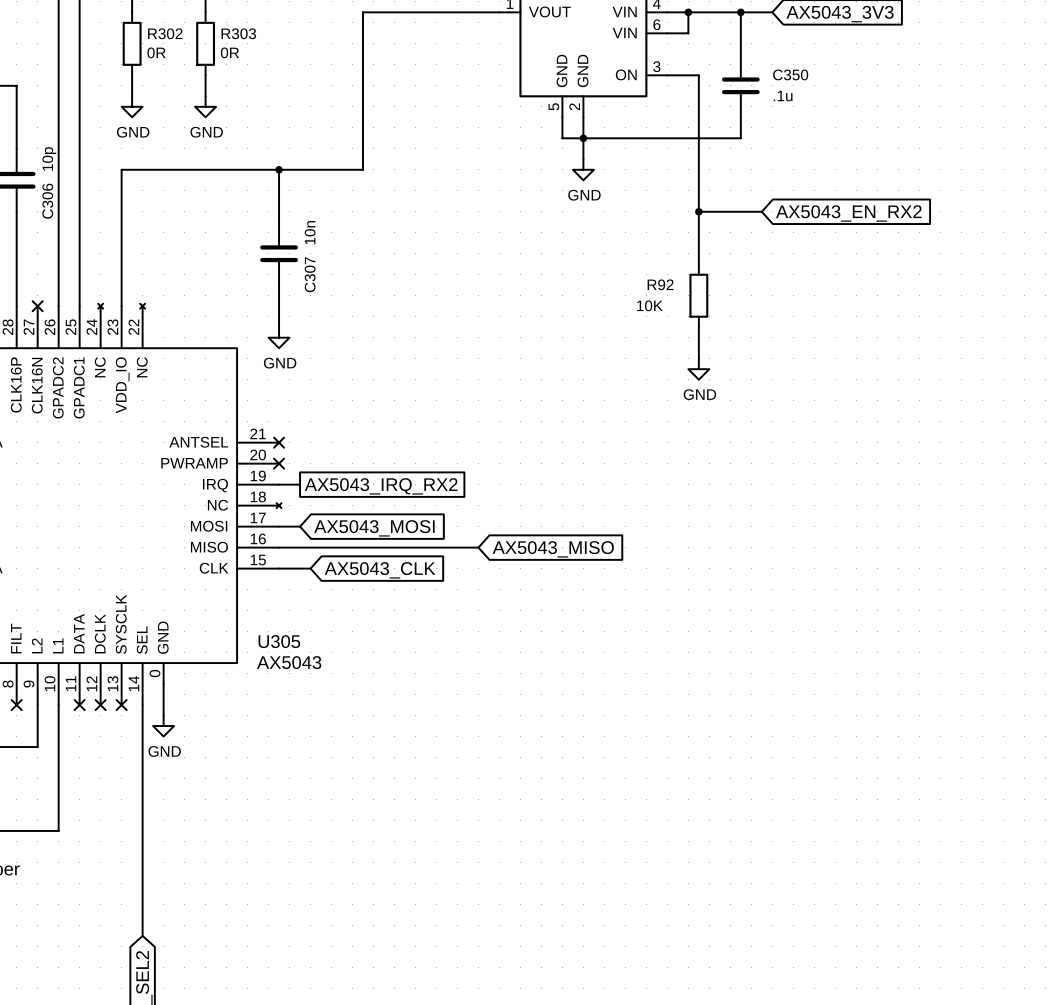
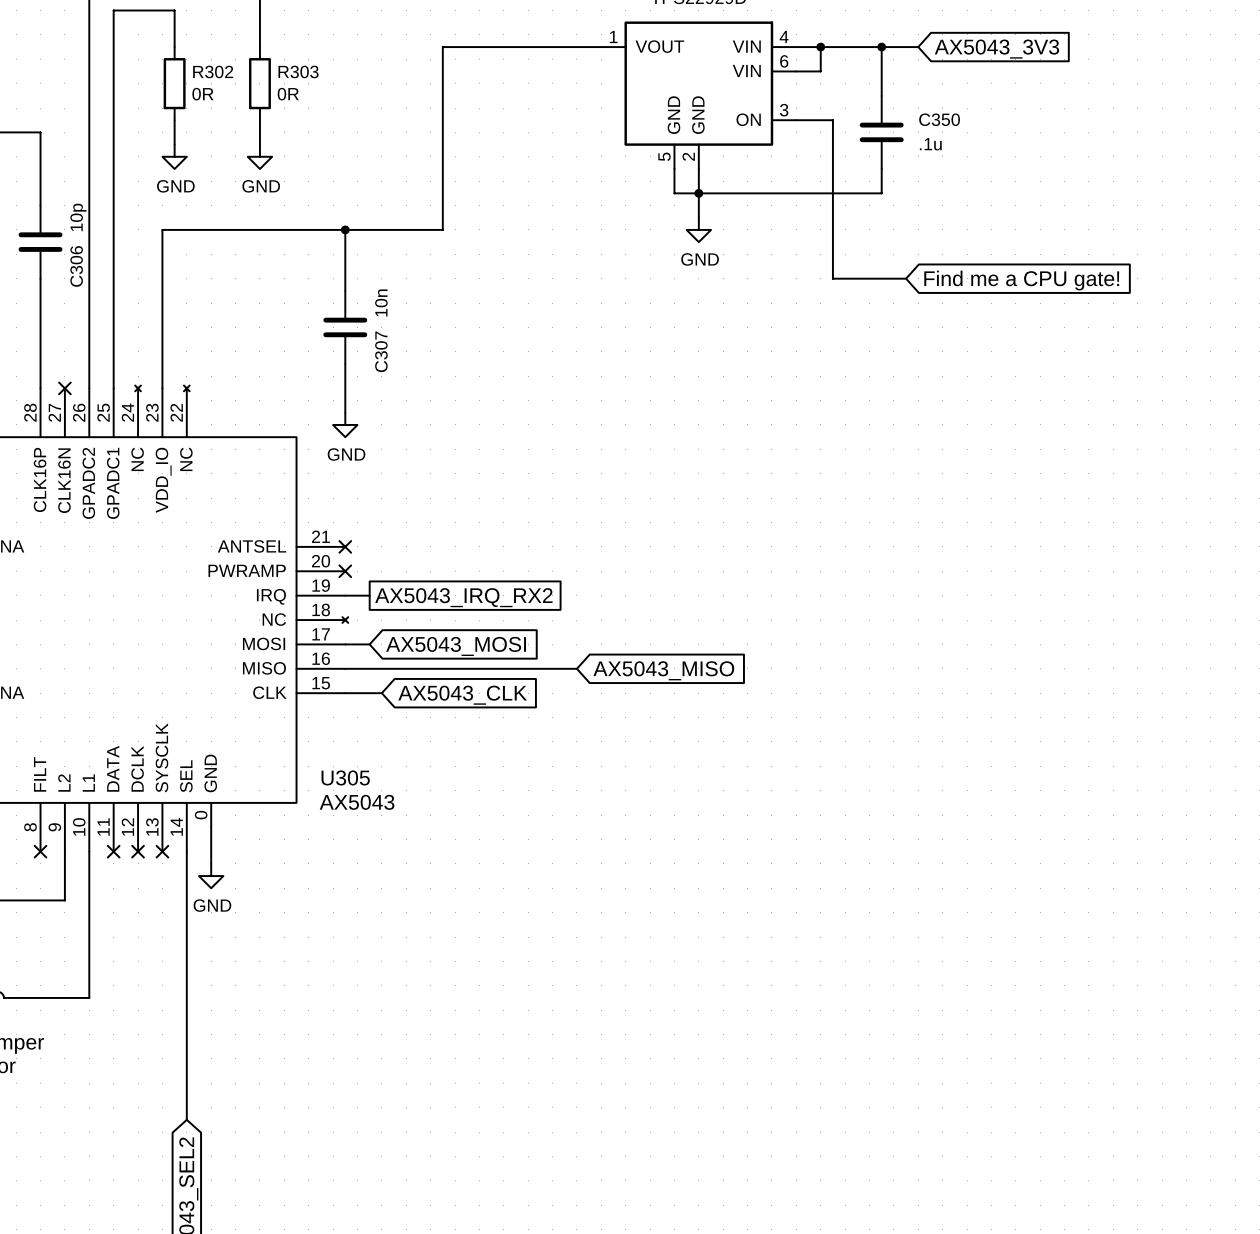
wire: (698, 211) (698, 264) -> none
junction: (698, 211) -> none
global label: AX5043_EN_RX2 (848, 213) -> Find me a CPU gate! (1021, 280)
R92: 10K (698, 295) -> none
wire: (698, 327) (698, 358) -> none
power symbol: GND (698, 369) -> none

